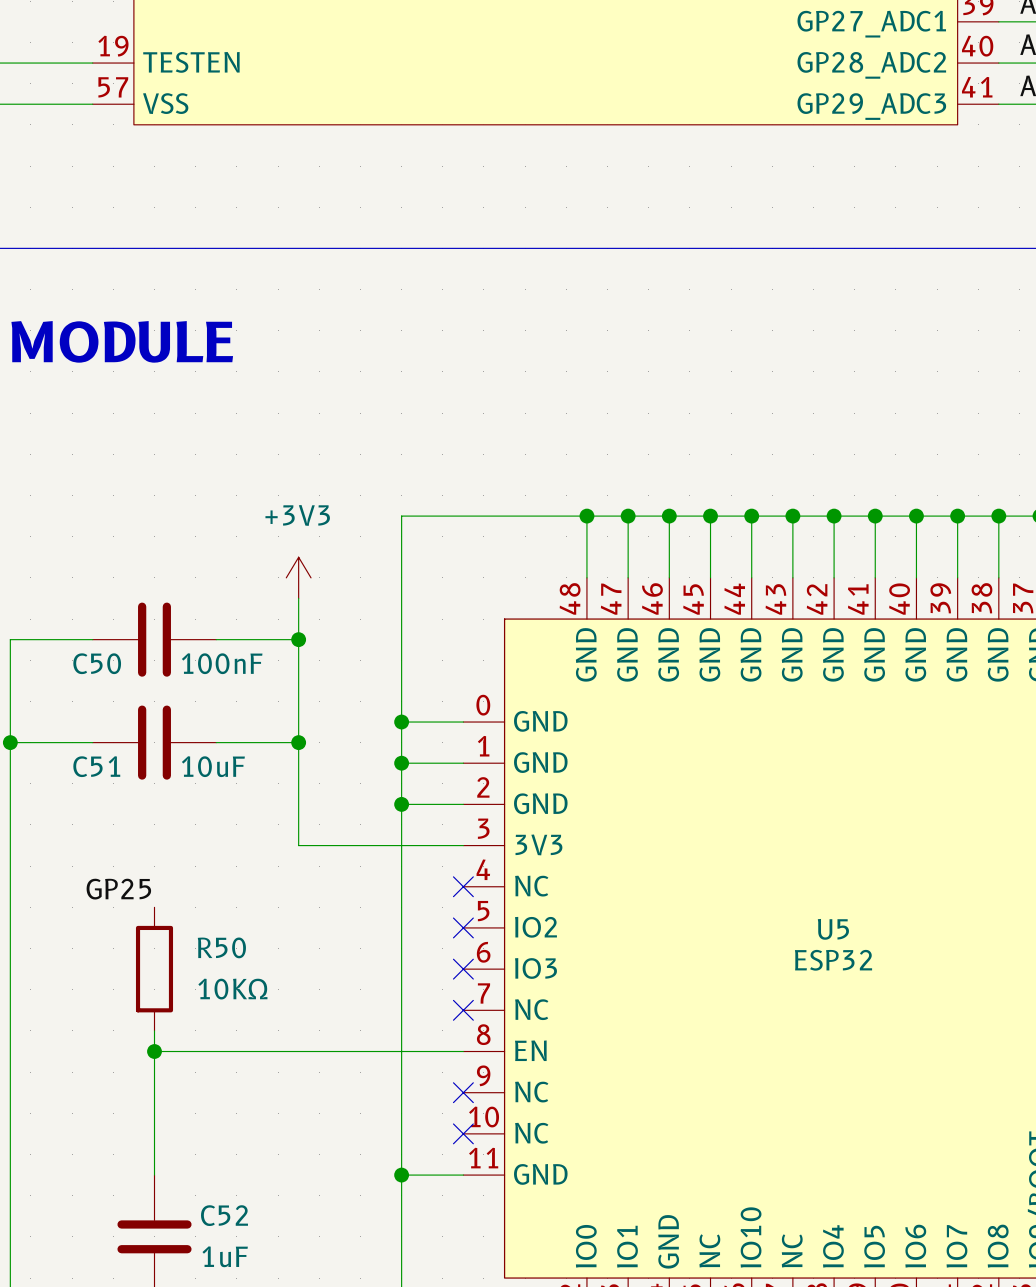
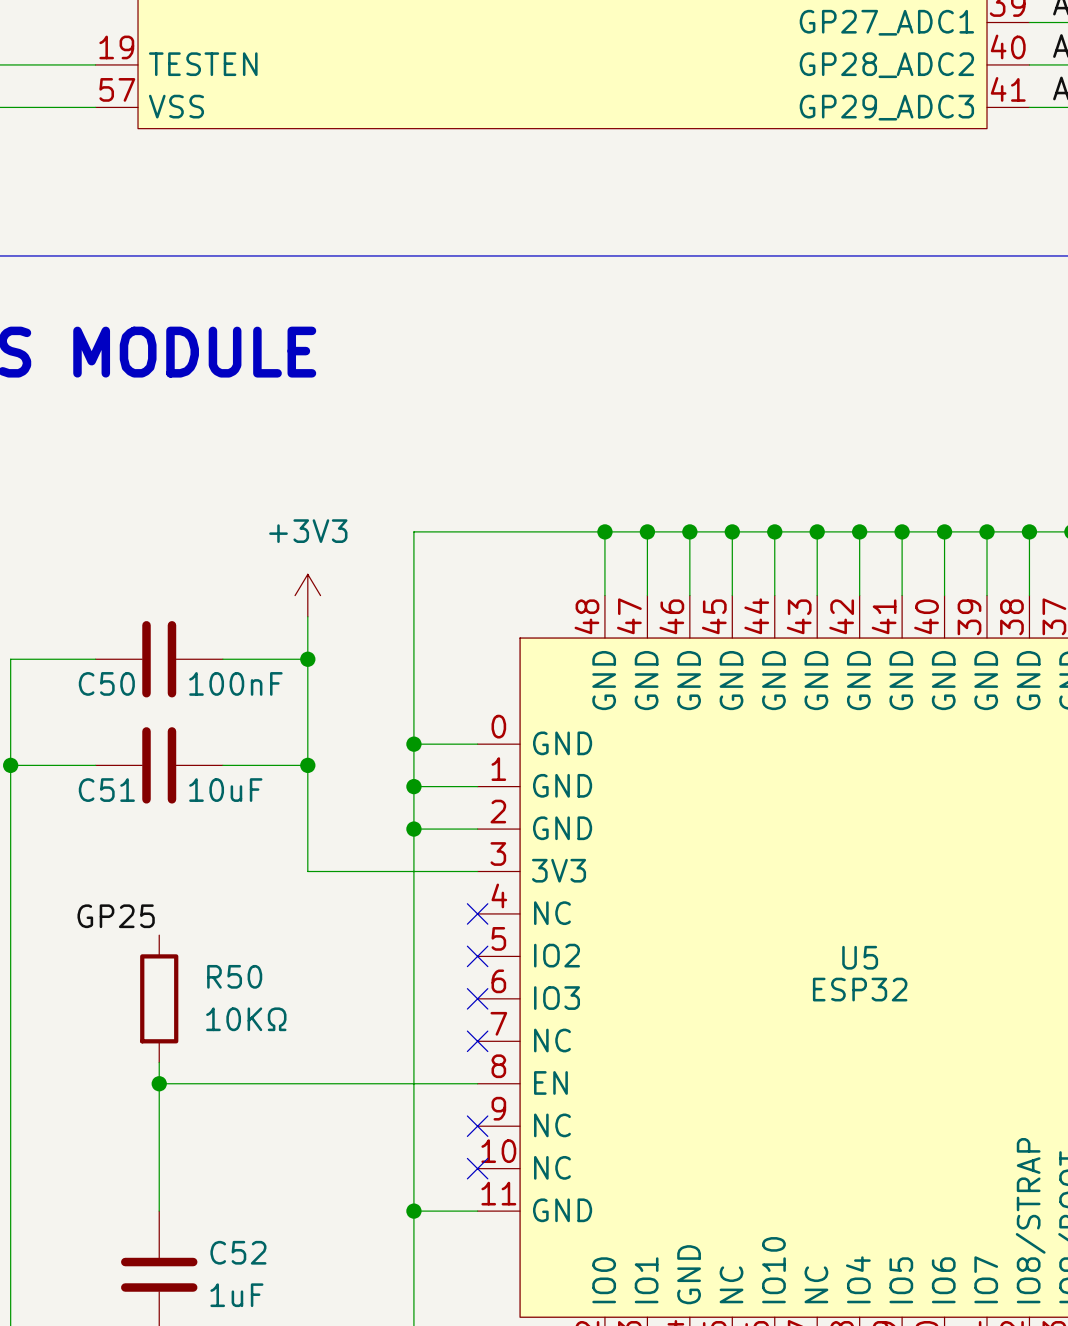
U5 pin name: IO8 (998, 1246) -> IO8/STRAP (1030, 1220)

